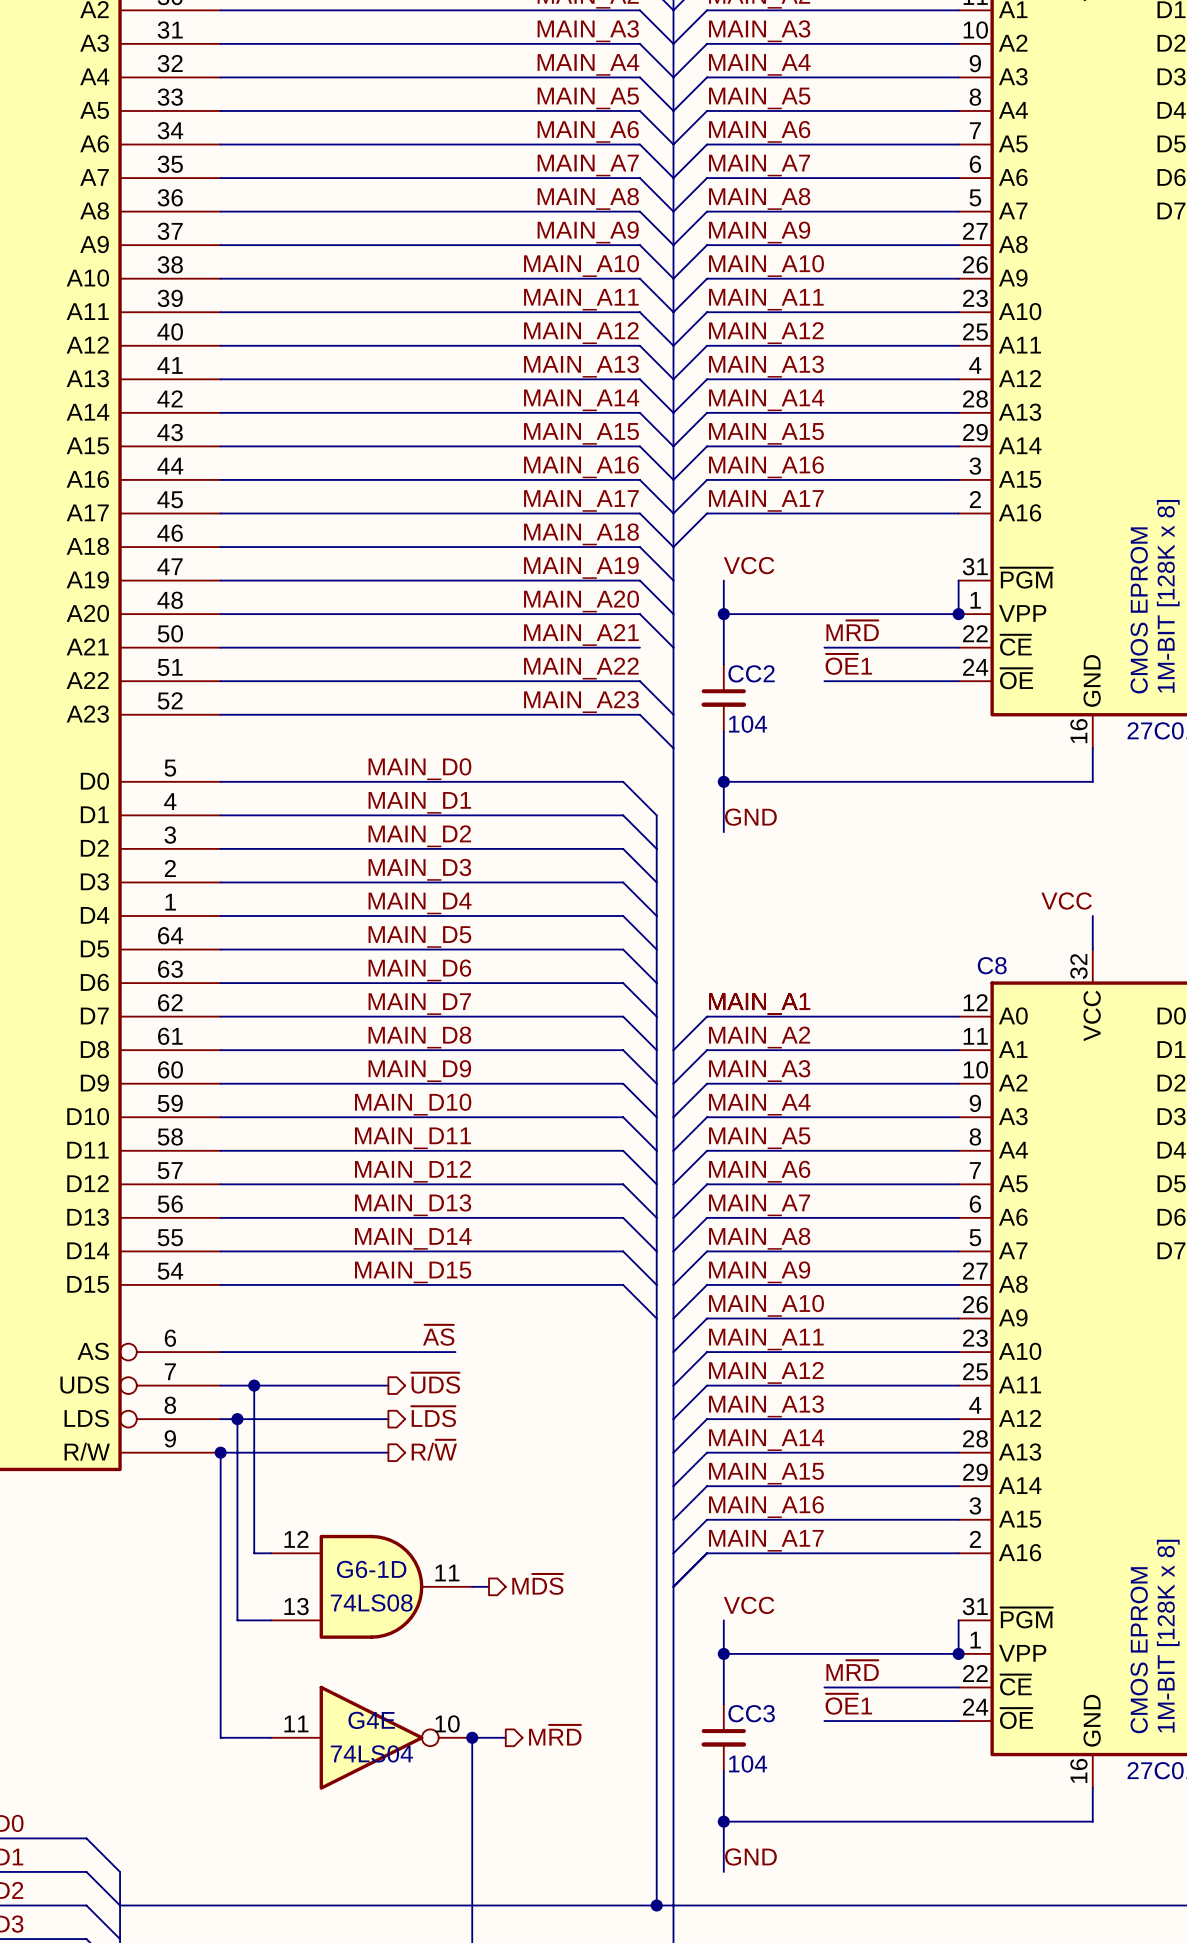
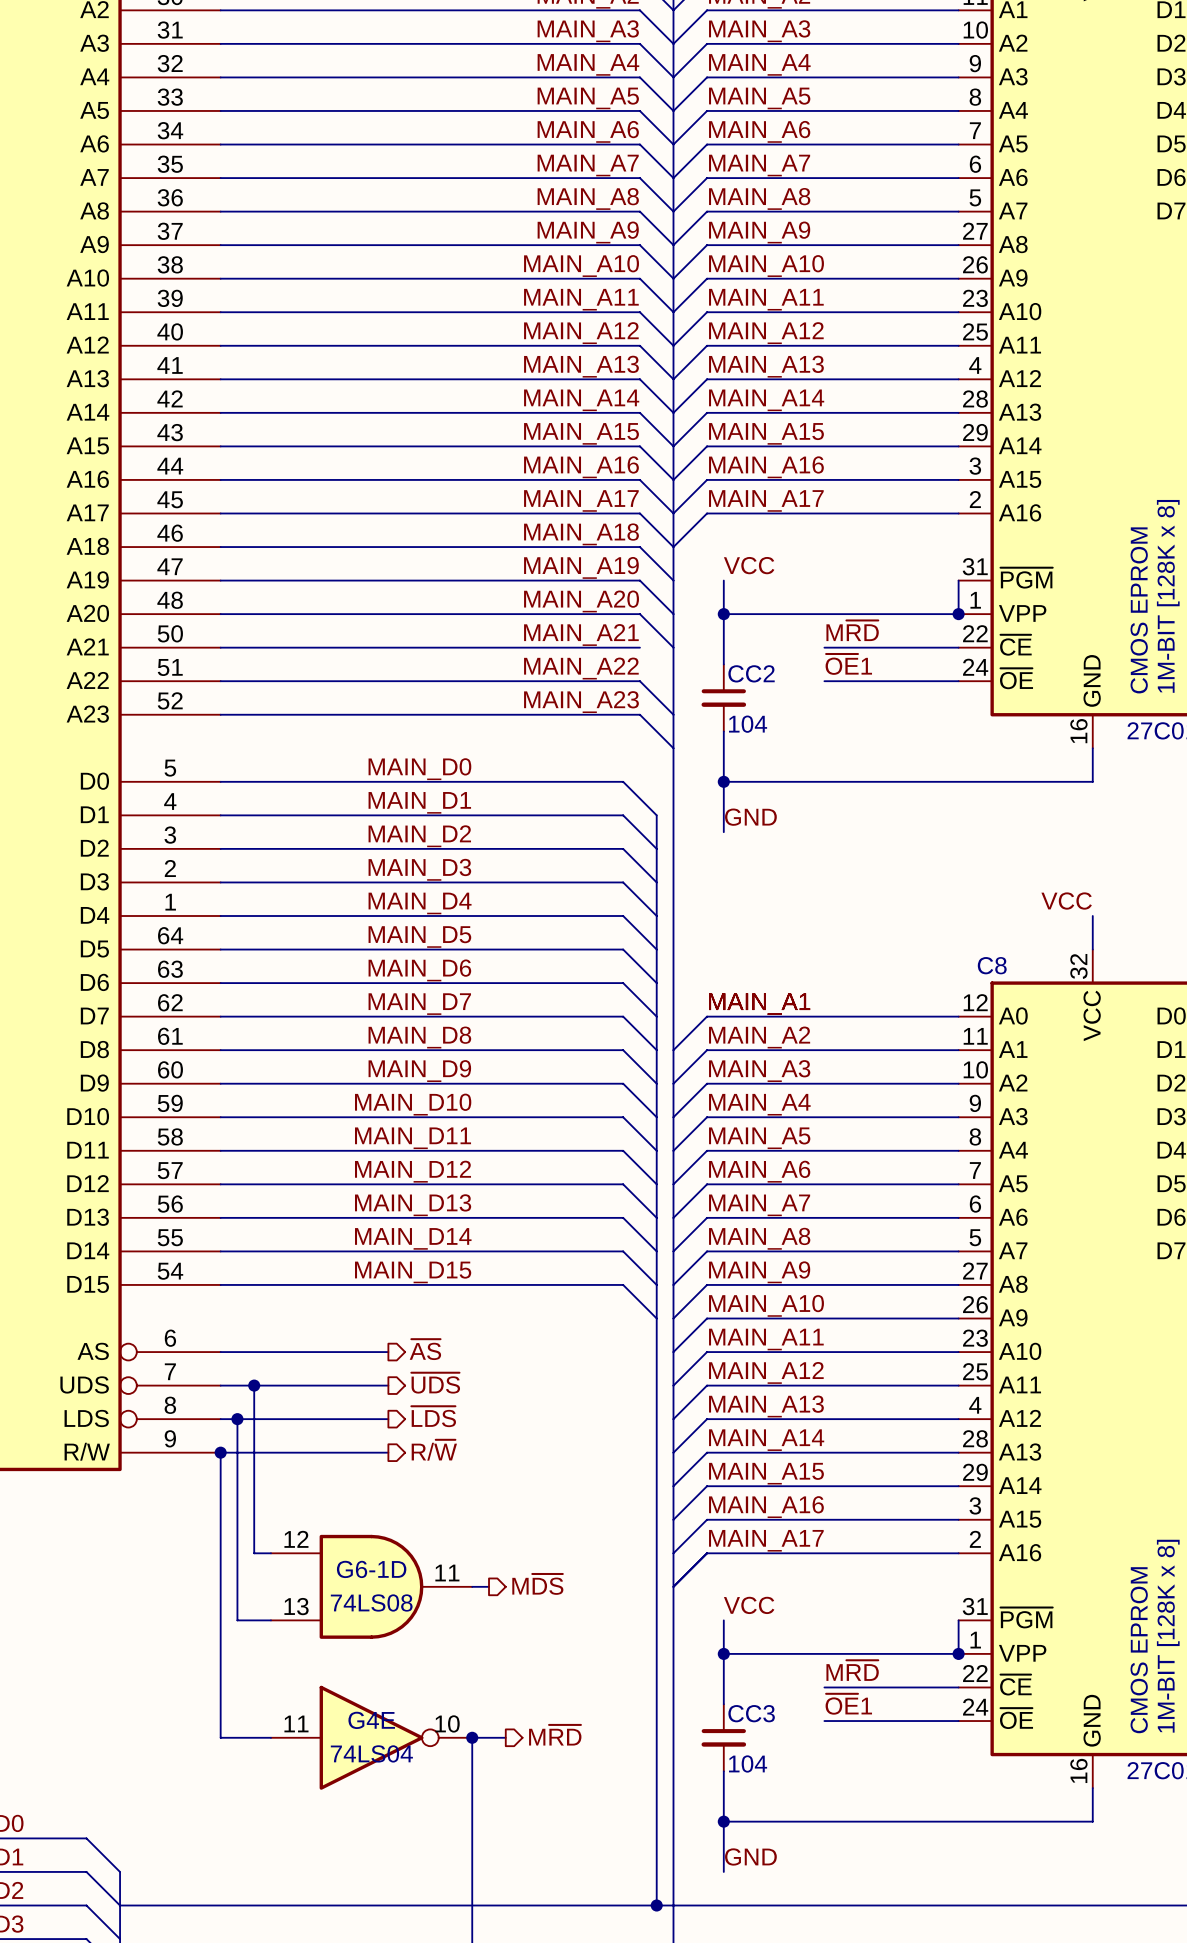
label: ~{AS} (438, 1335) -> none
hierarchical label: none -> ~{AS} (425, 1349)
wire: (388, 1352) (455, 1352) -> none

